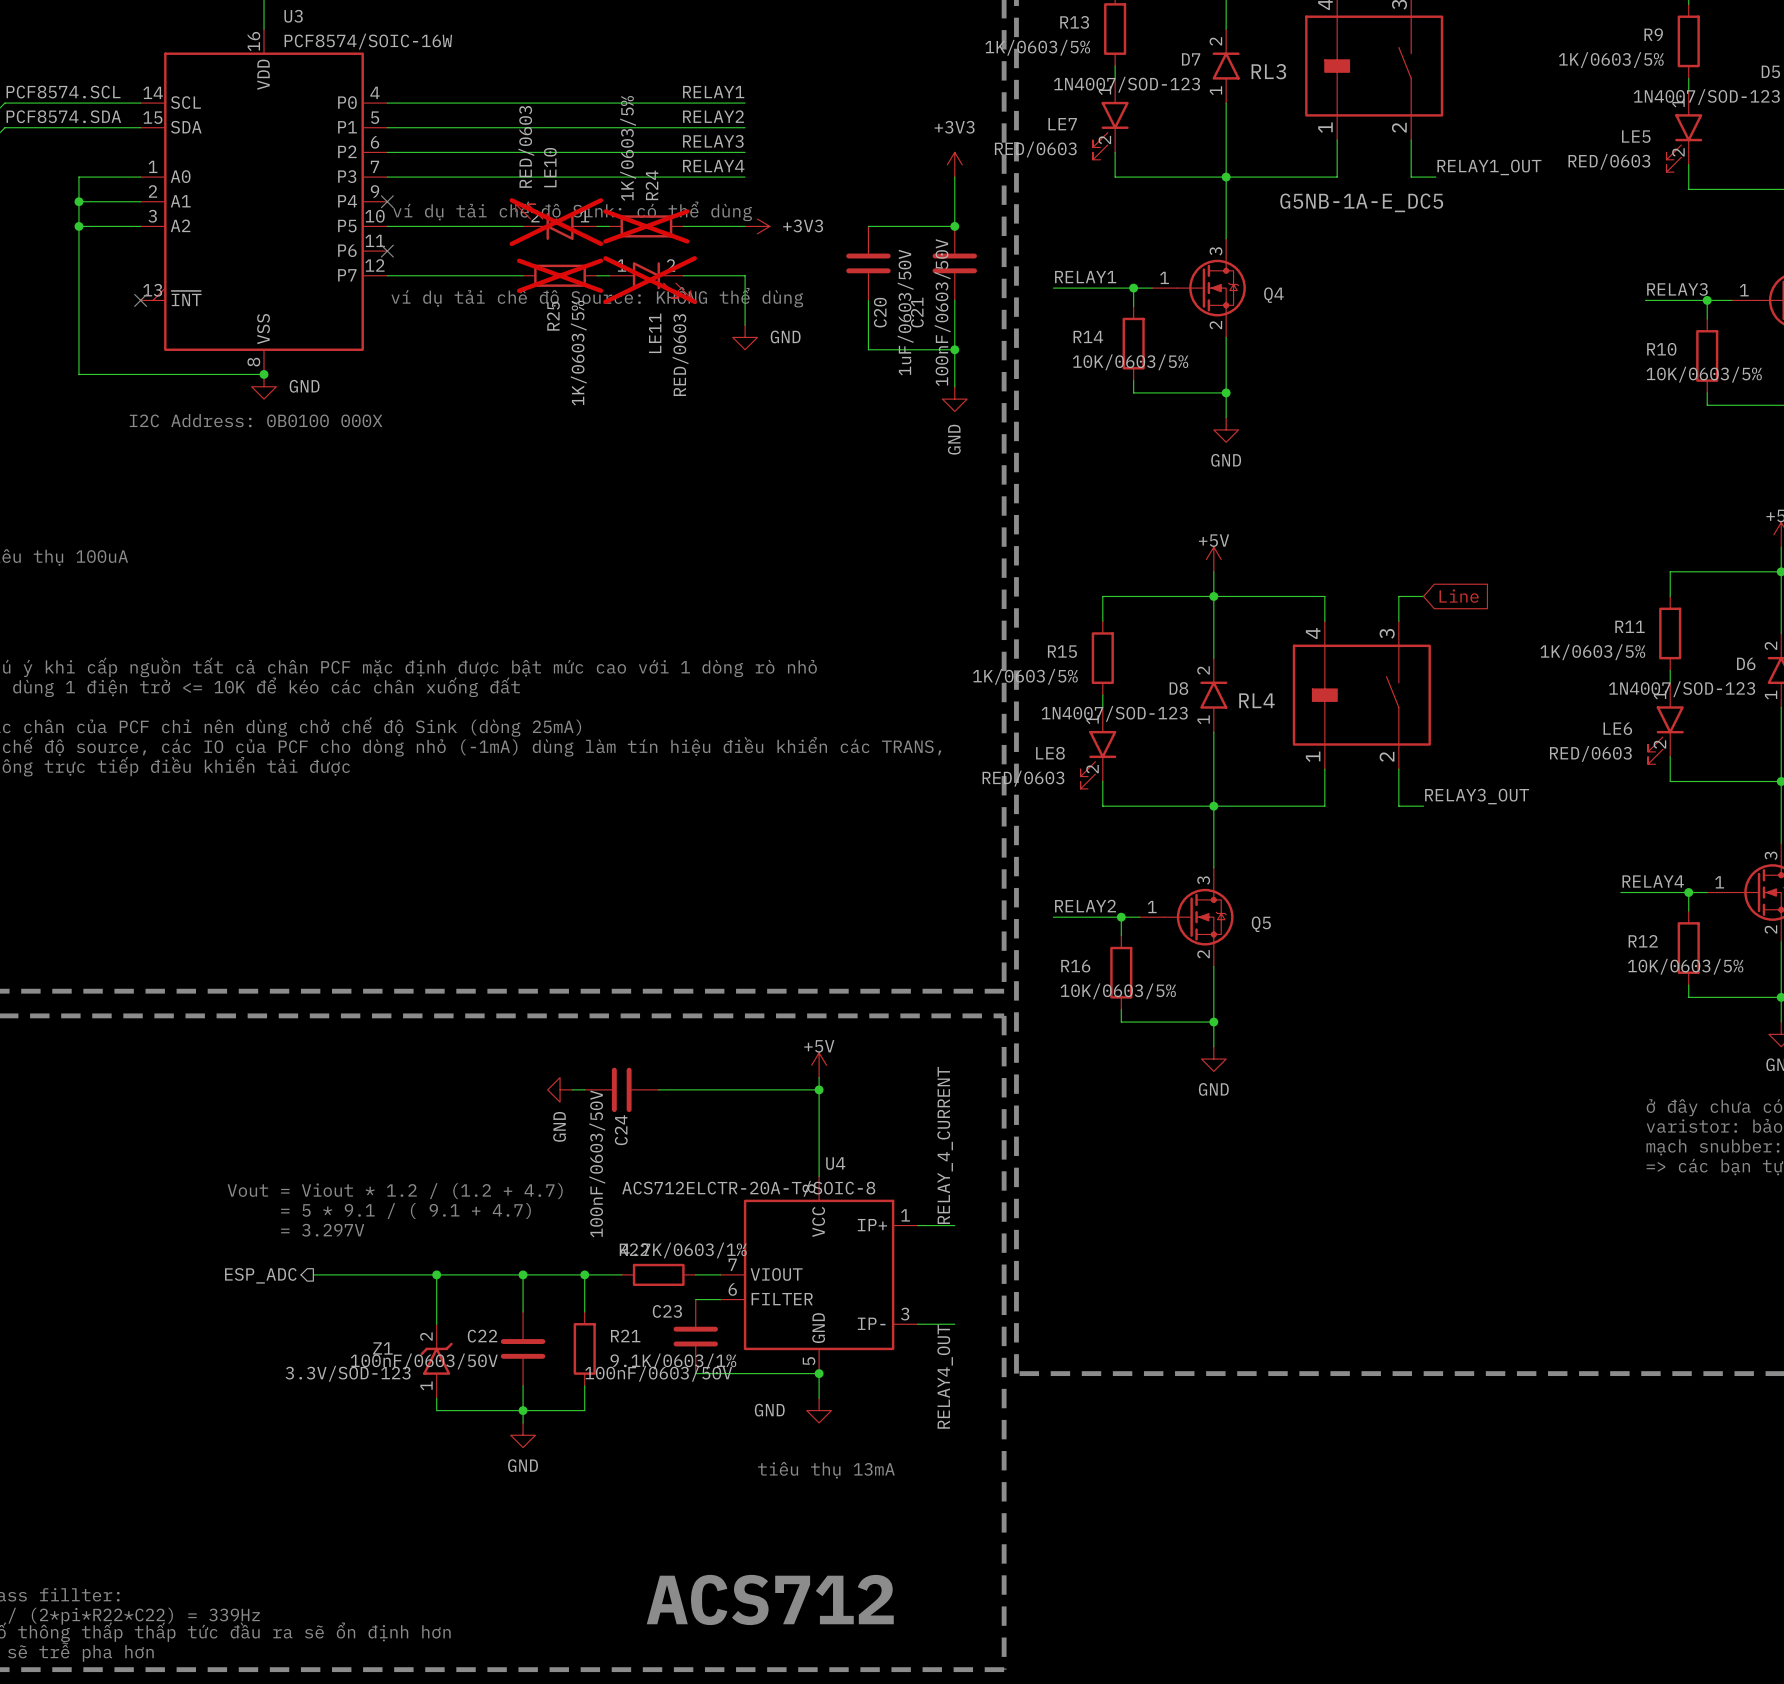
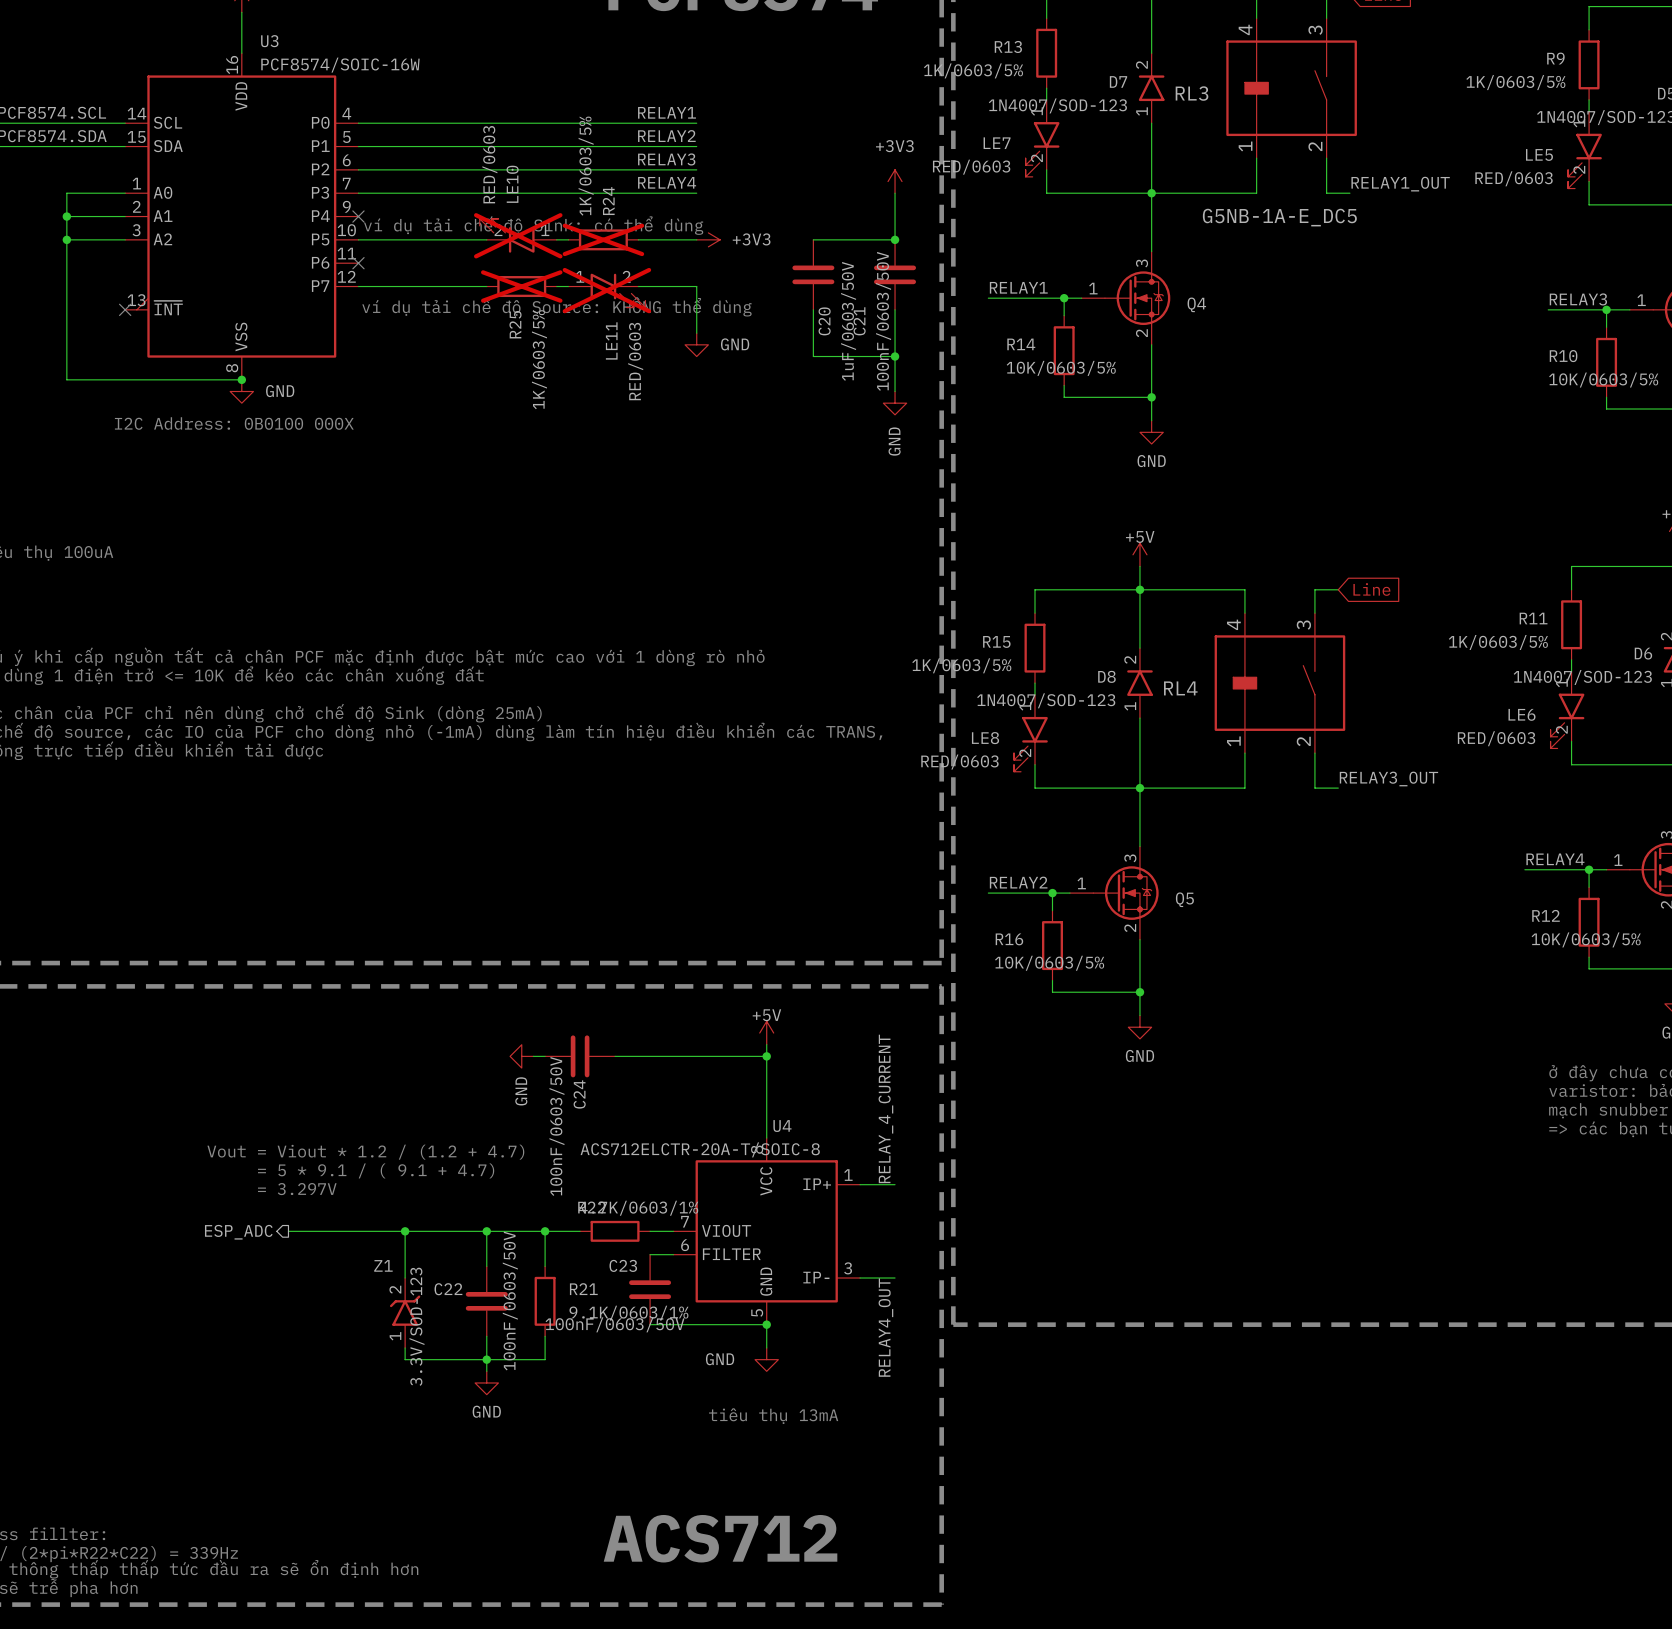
Z1 name position: Z1 (382, 1348) -> Z1 (383, 1265)
C22 value rotation: 0° (424, 1361) -> 90° counterclockwise (510, 1300)
Z1 value rotation: 0° (348, 1373) -> 90° counterclockwise (416, 1326)

